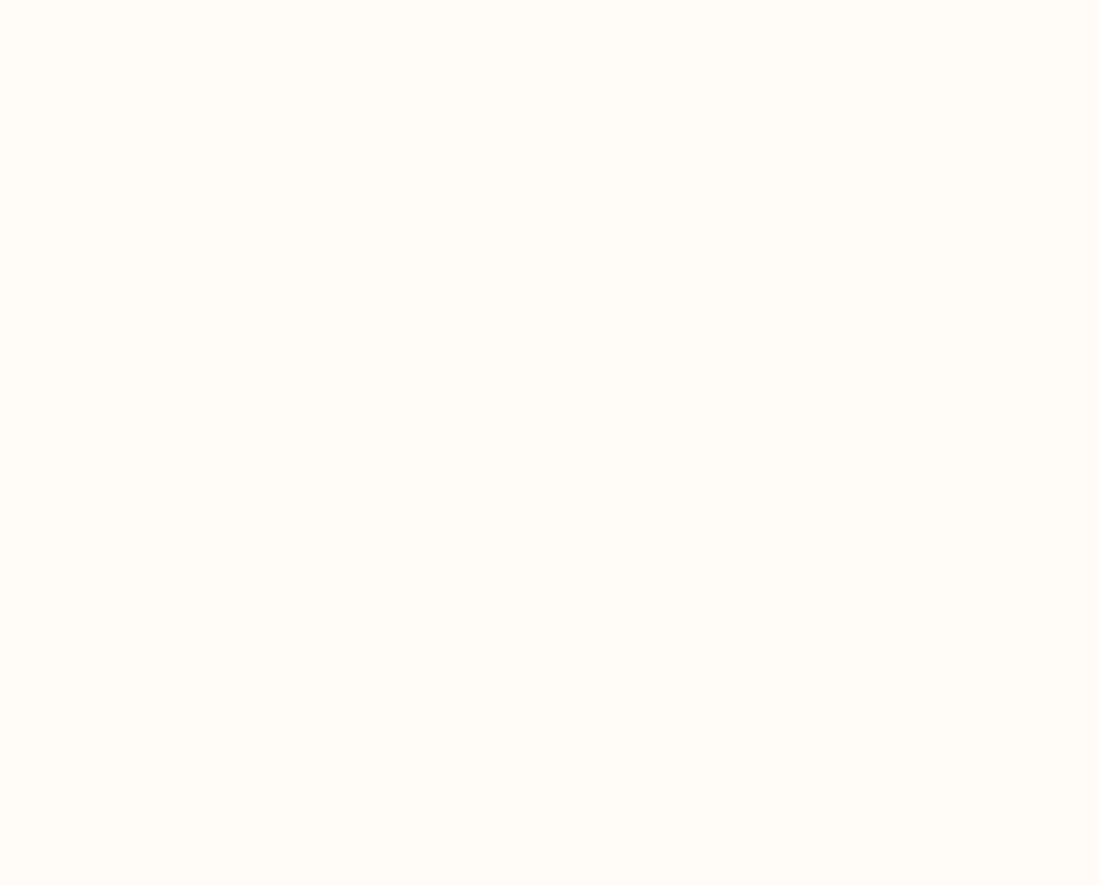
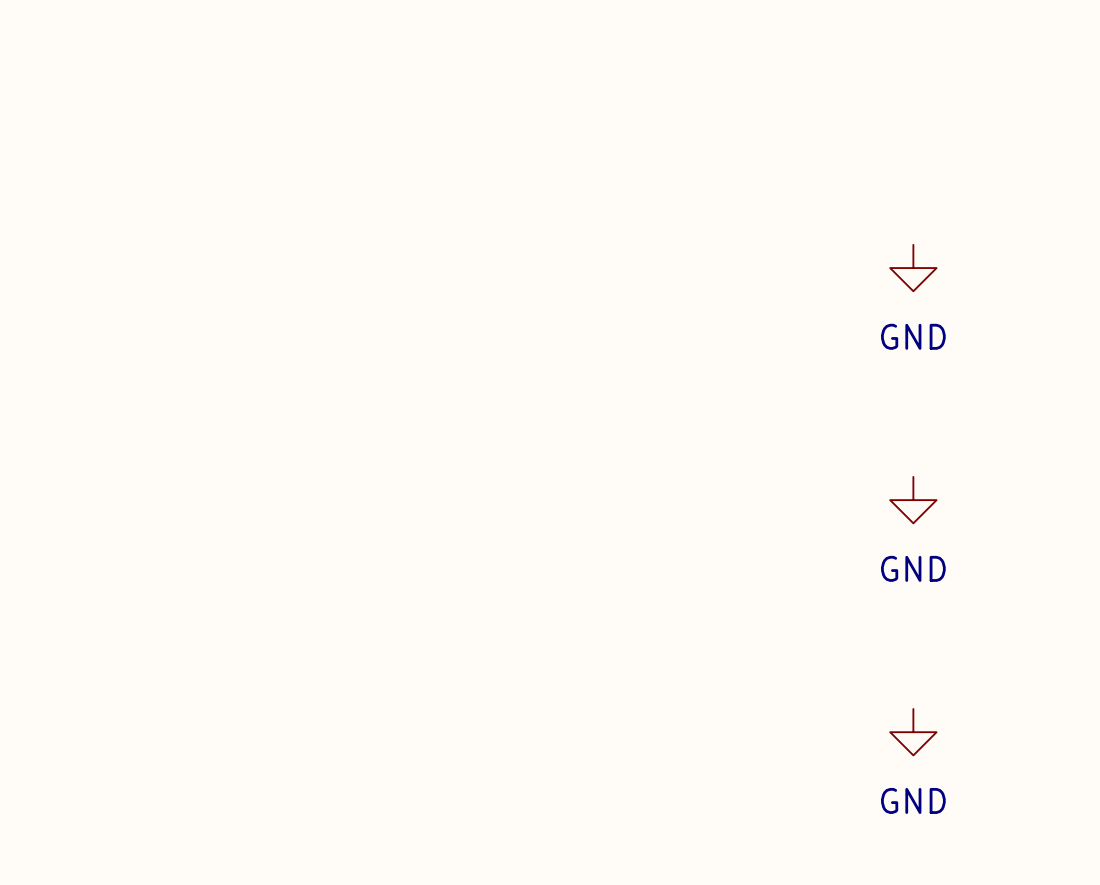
power symbol: none -> GND (913, 268)
power symbol: none -> GND (913, 500)
power symbol: none -> GND (913, 732)

